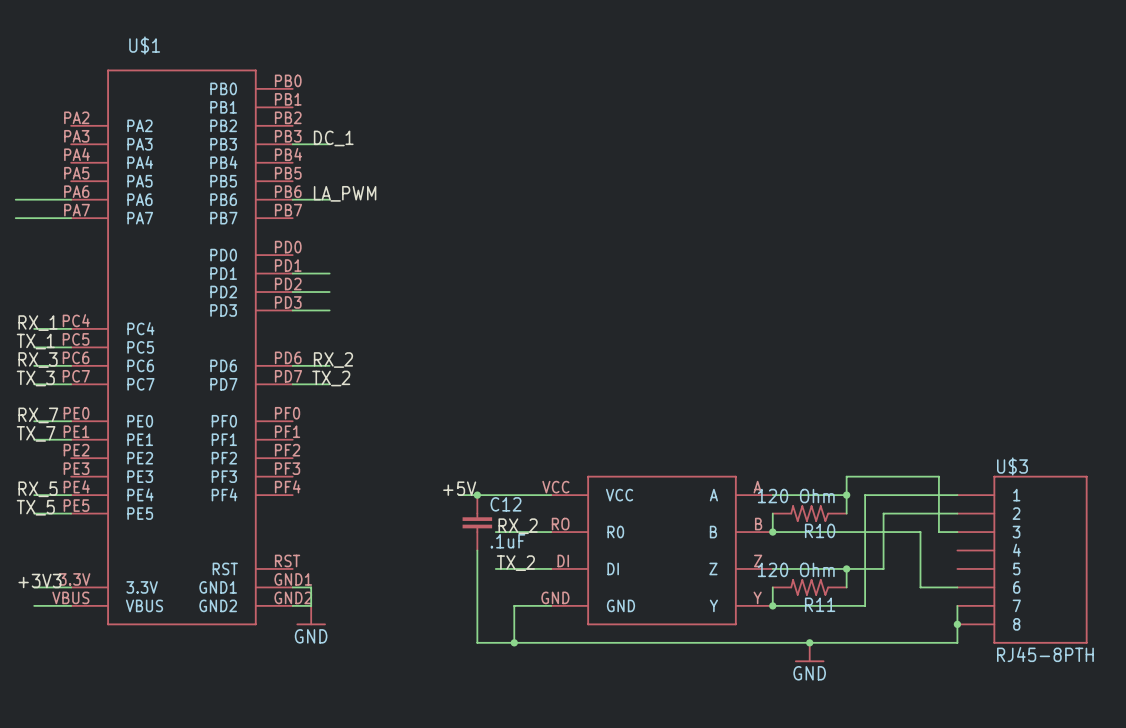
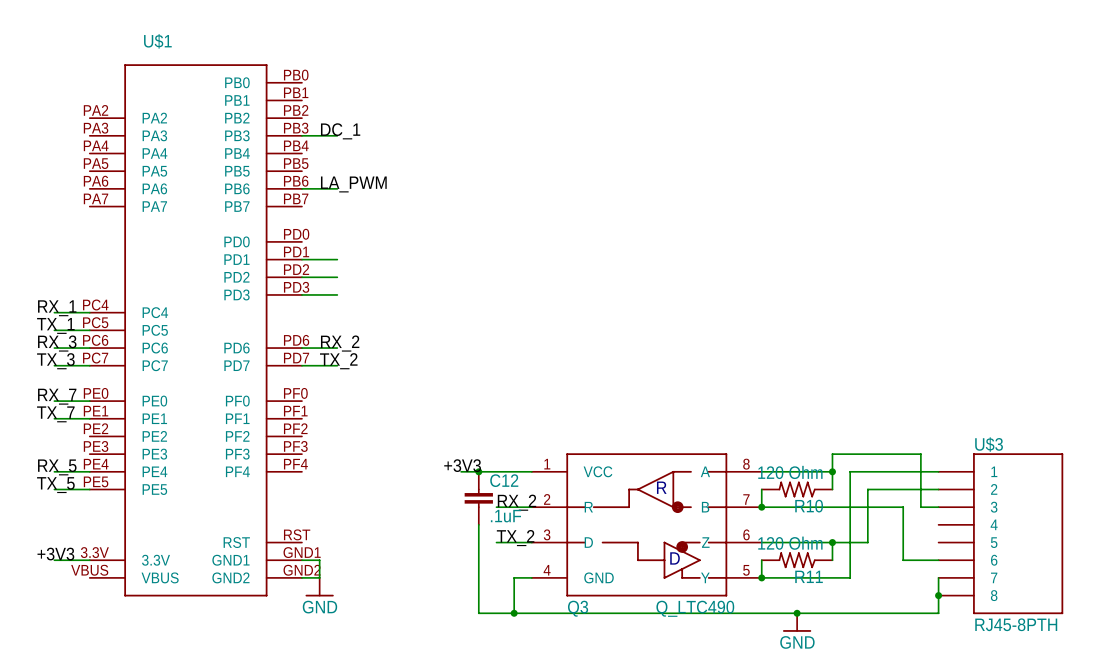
wire: (15, 199) (71, 199) -> none
wire: (15, 218) (71, 218) -> none
label: +5V (459, 488) -> +3V3 (462, 465)
Q3: none -> Q_LTC490 (646, 524)
part: (661, 550) -> none
wire: (34, 605) (71, 605) -> none

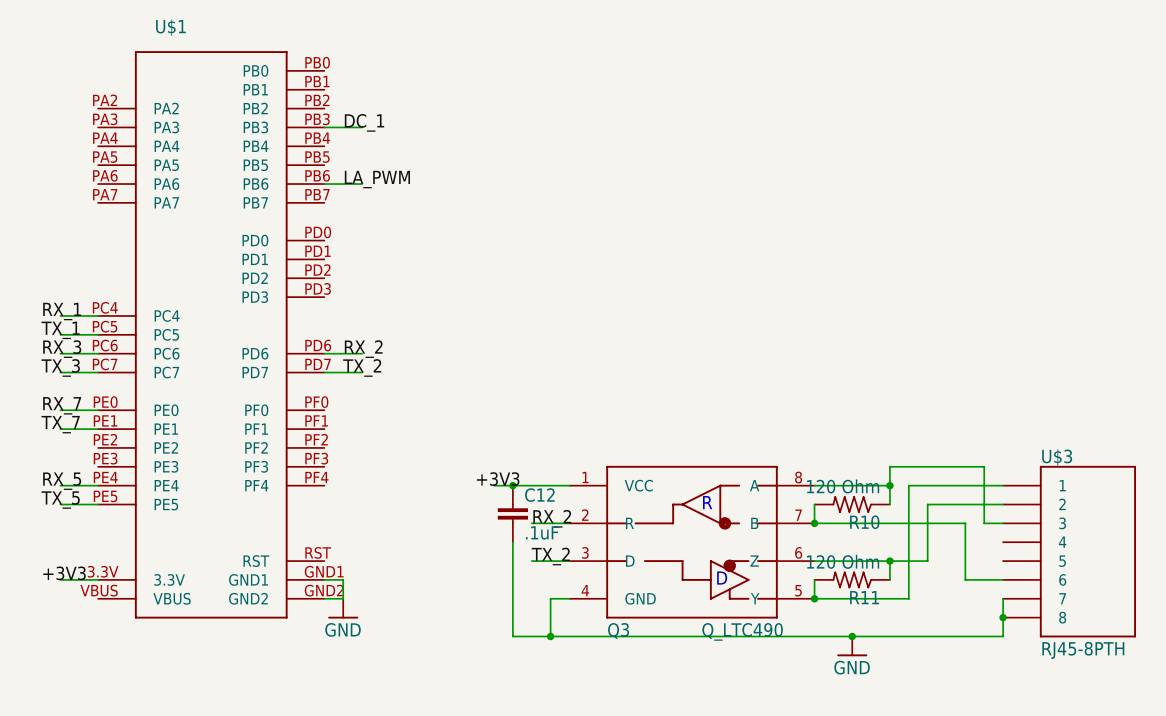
wire: (301, 259) (337, 259) -> none
wire: (301, 277) (337, 277) -> none
wire: (301, 294) (337, 294) -> none

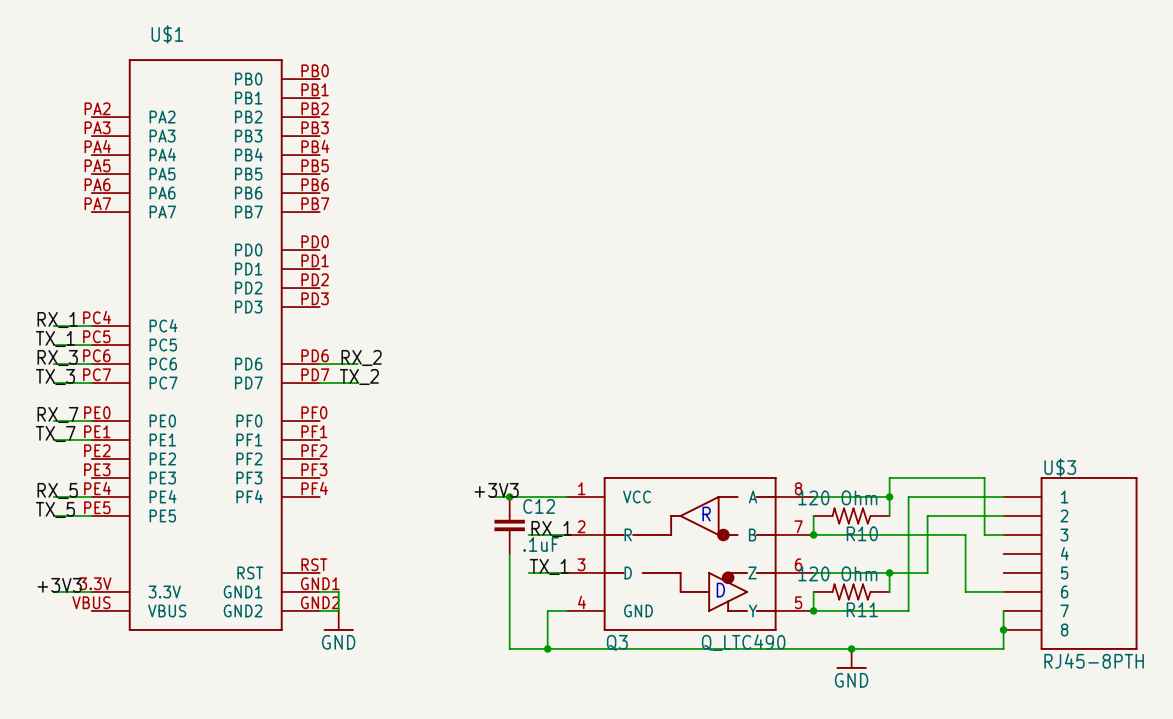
label: DC_1 (364, 122) -> none
wire: (324, 127) (362, 127) -> none
label: LA_PWM (377, 179) -> none
wire: (324, 184) (362, 184) -> none
label: RX_2 (552, 518) -> RX_1 (551, 528)
label: TX_2 (550, 556) -> TX_1 (549, 566)

